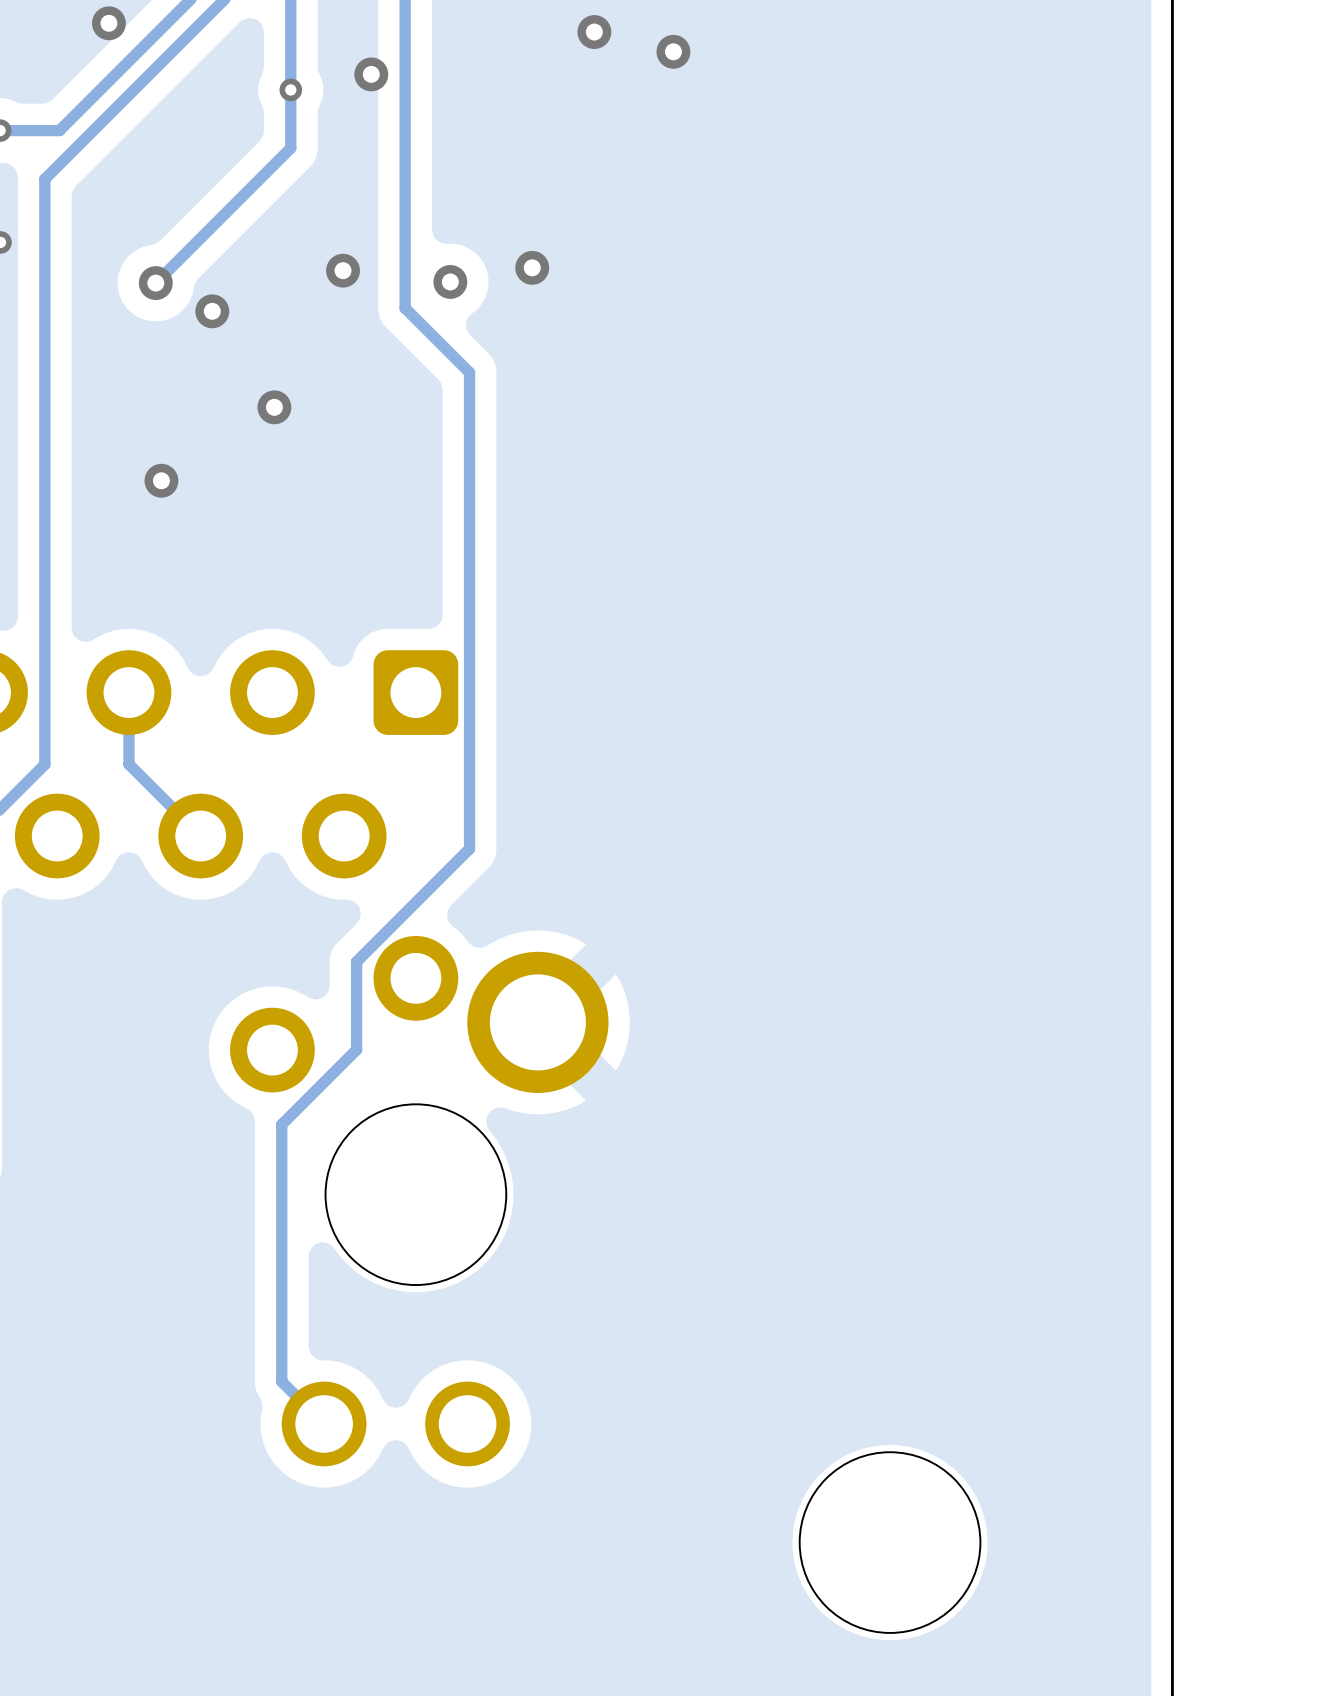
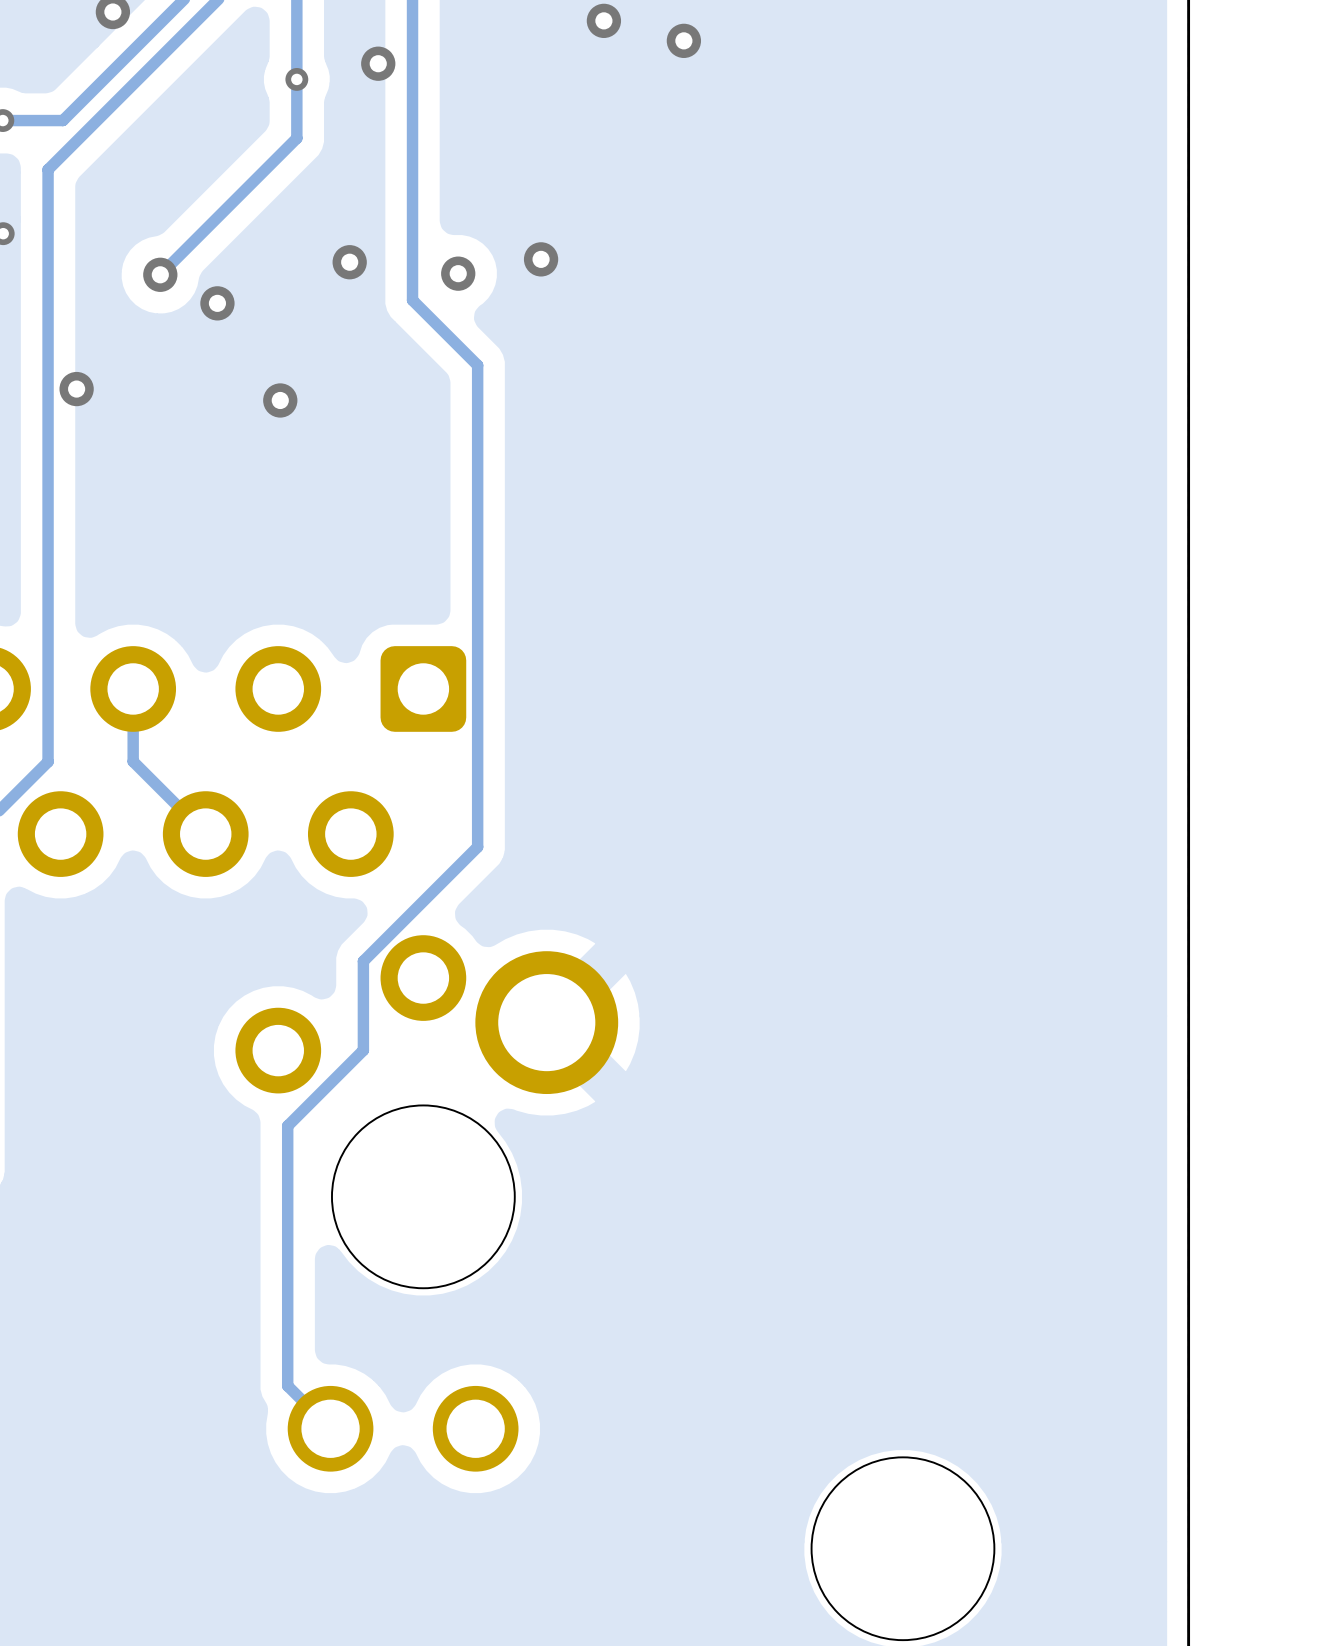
via position: (161, 480) -> (76, 389)

